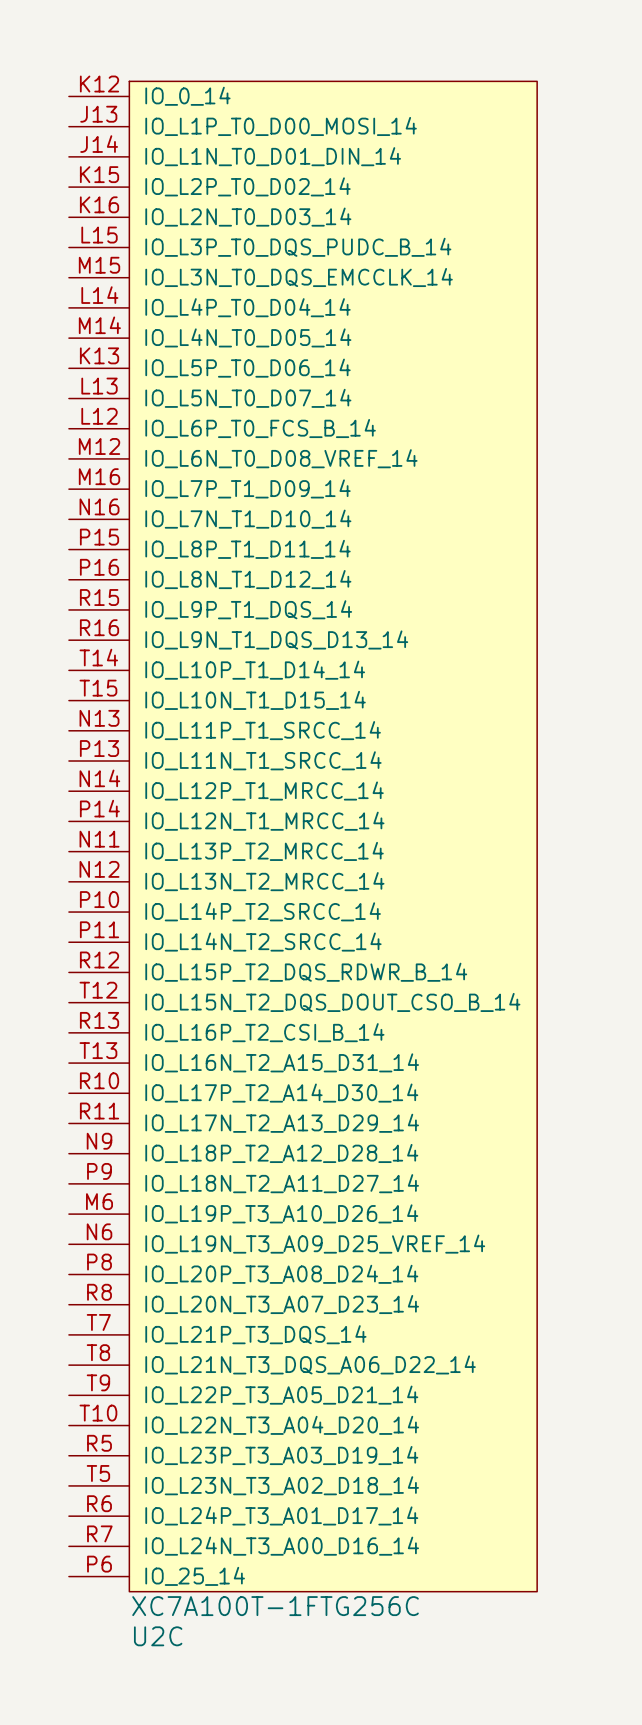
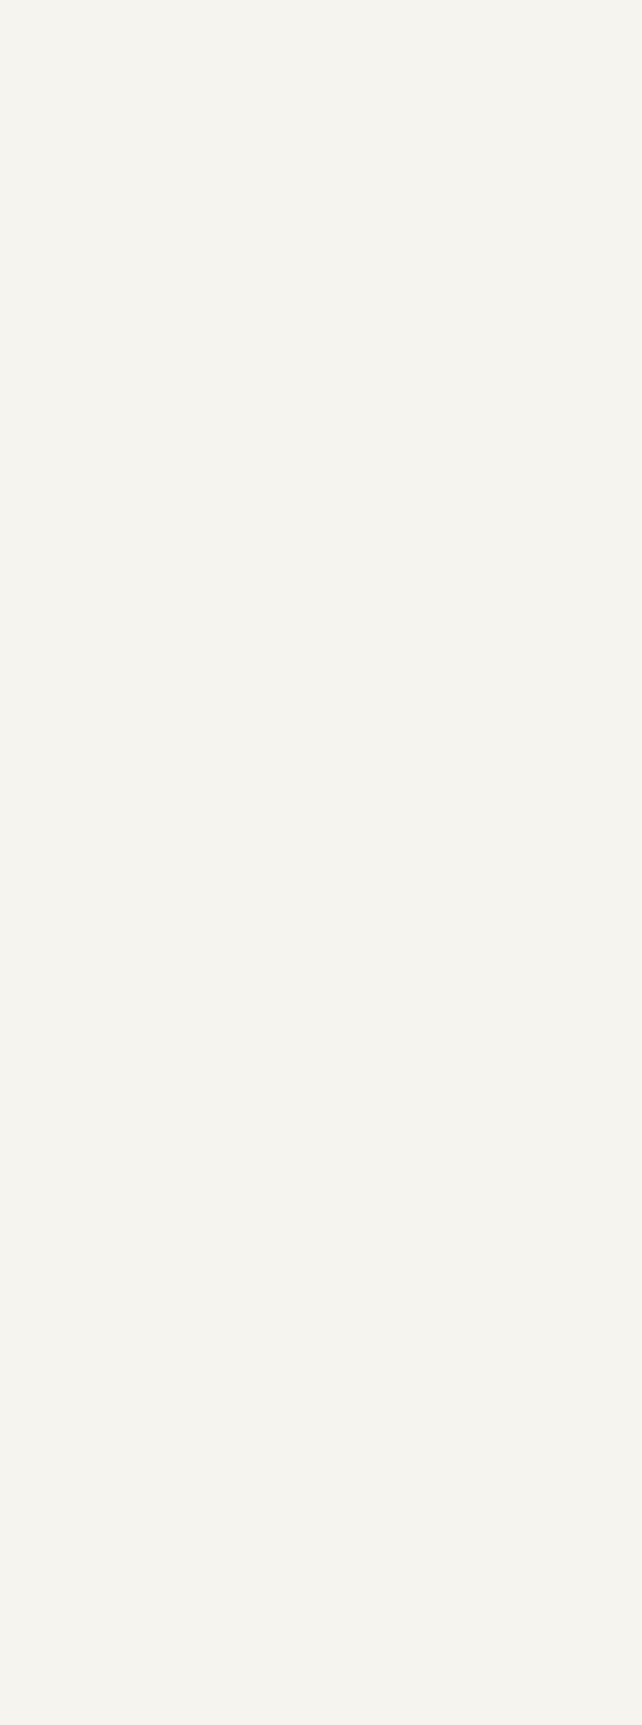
U2C: XC7A100T-1FTG256C (303, 836) -> none

